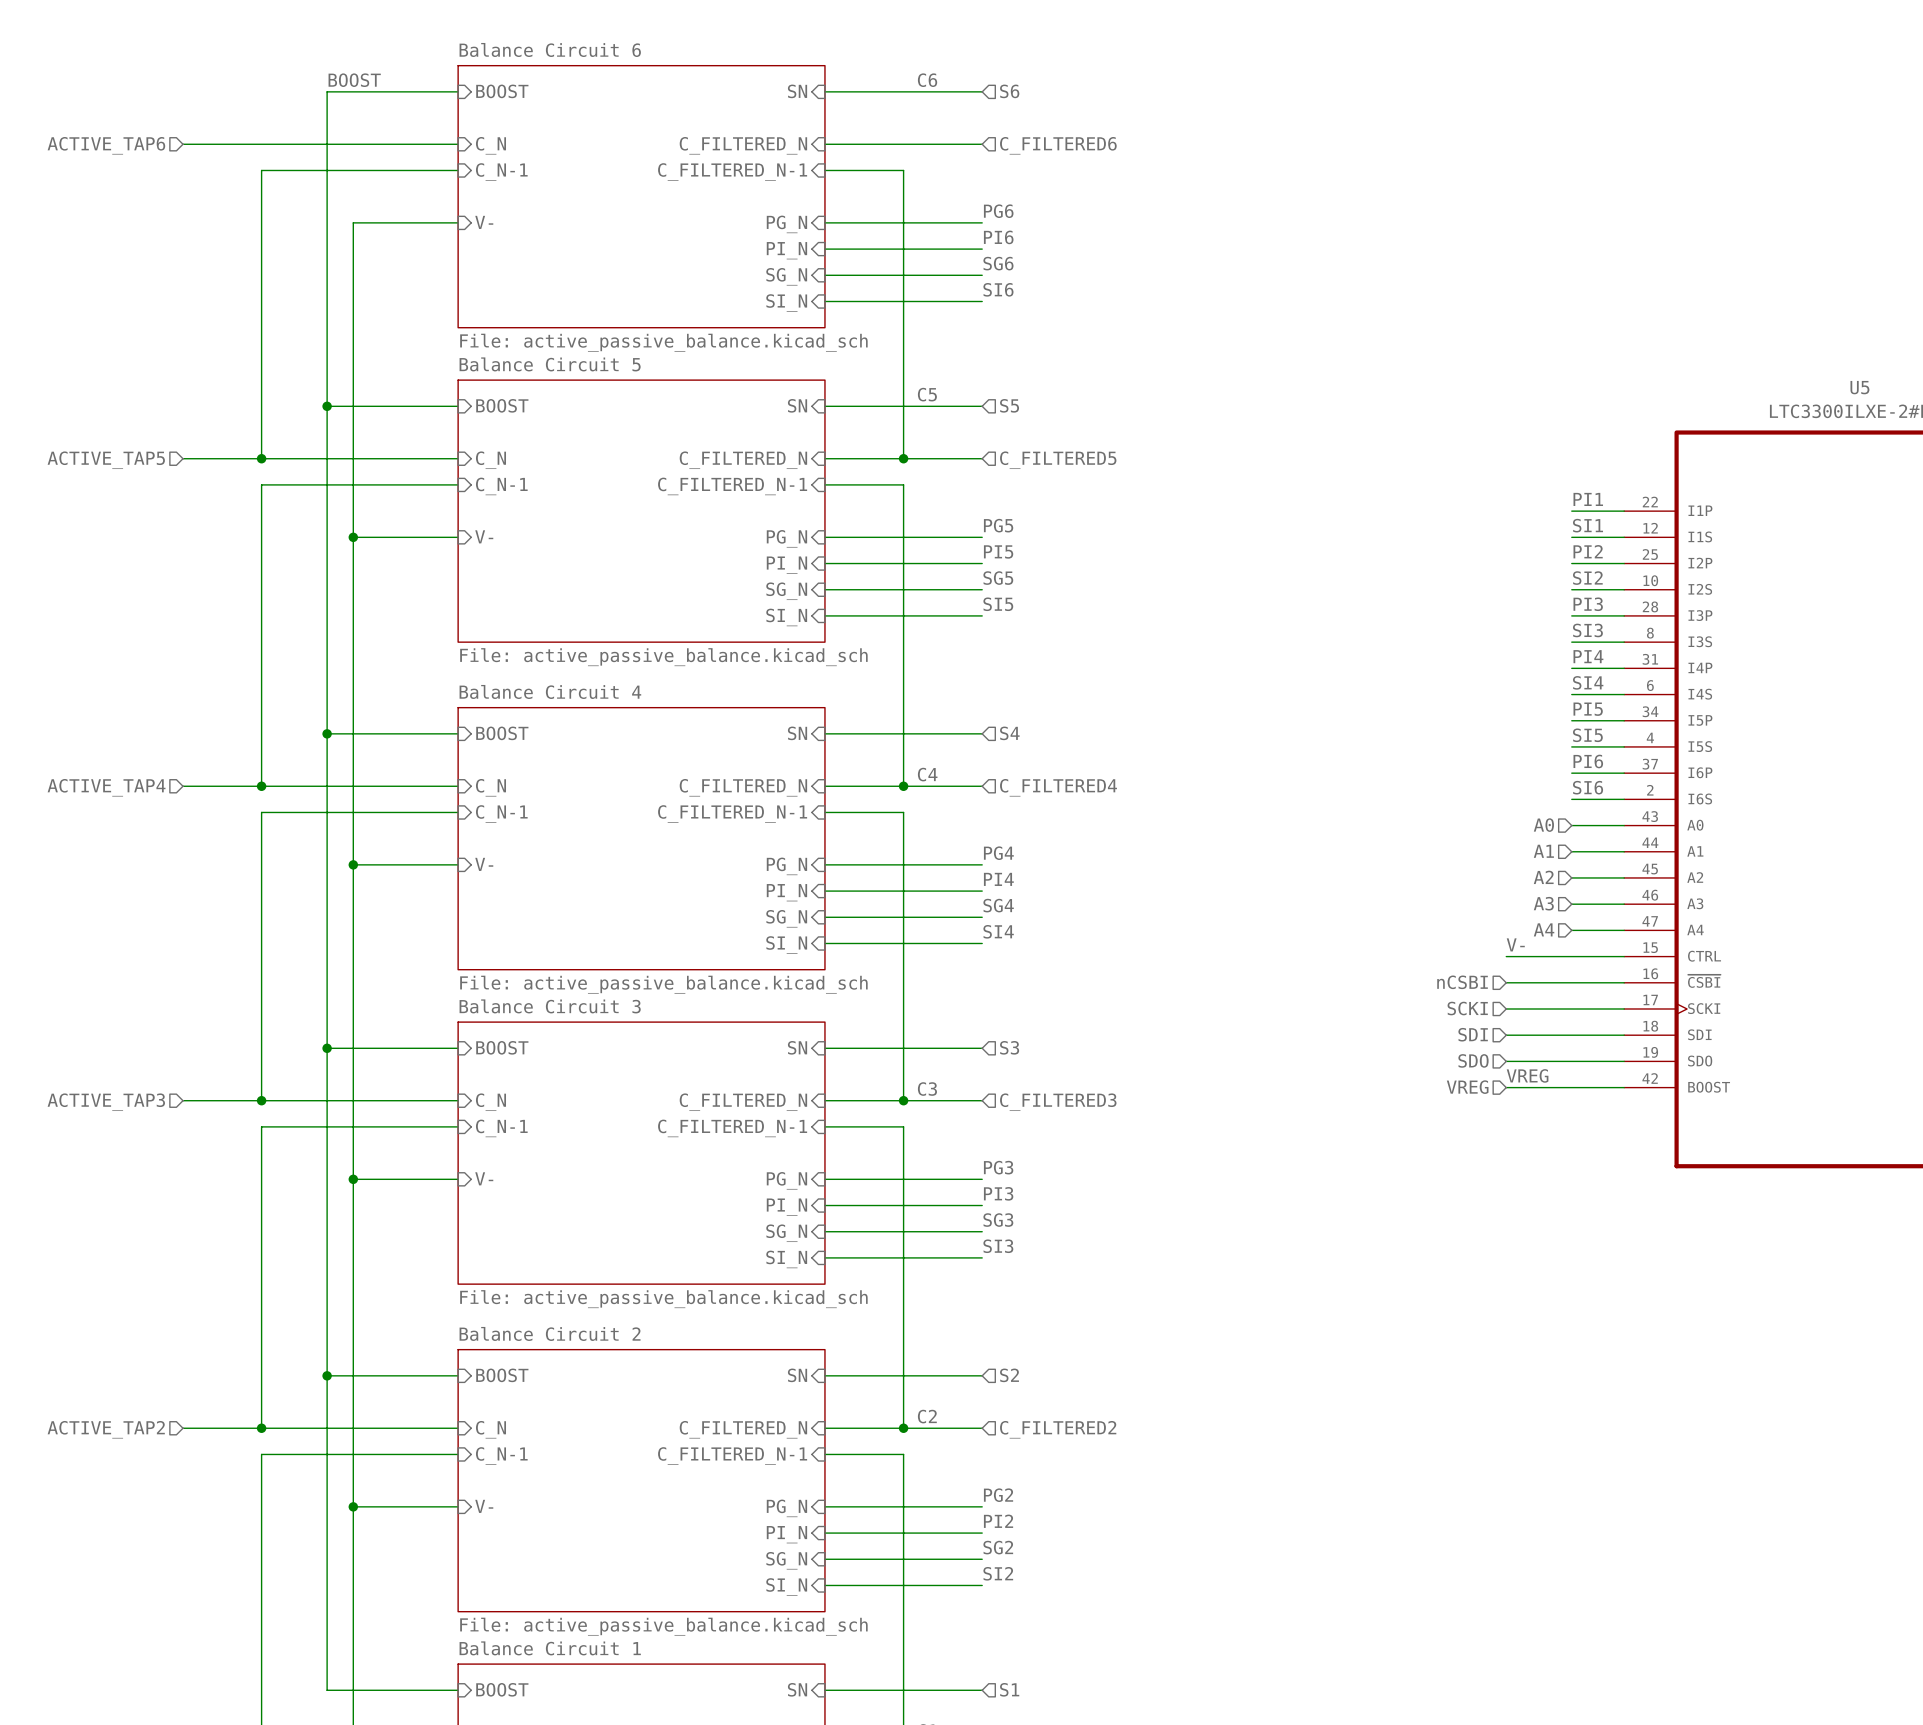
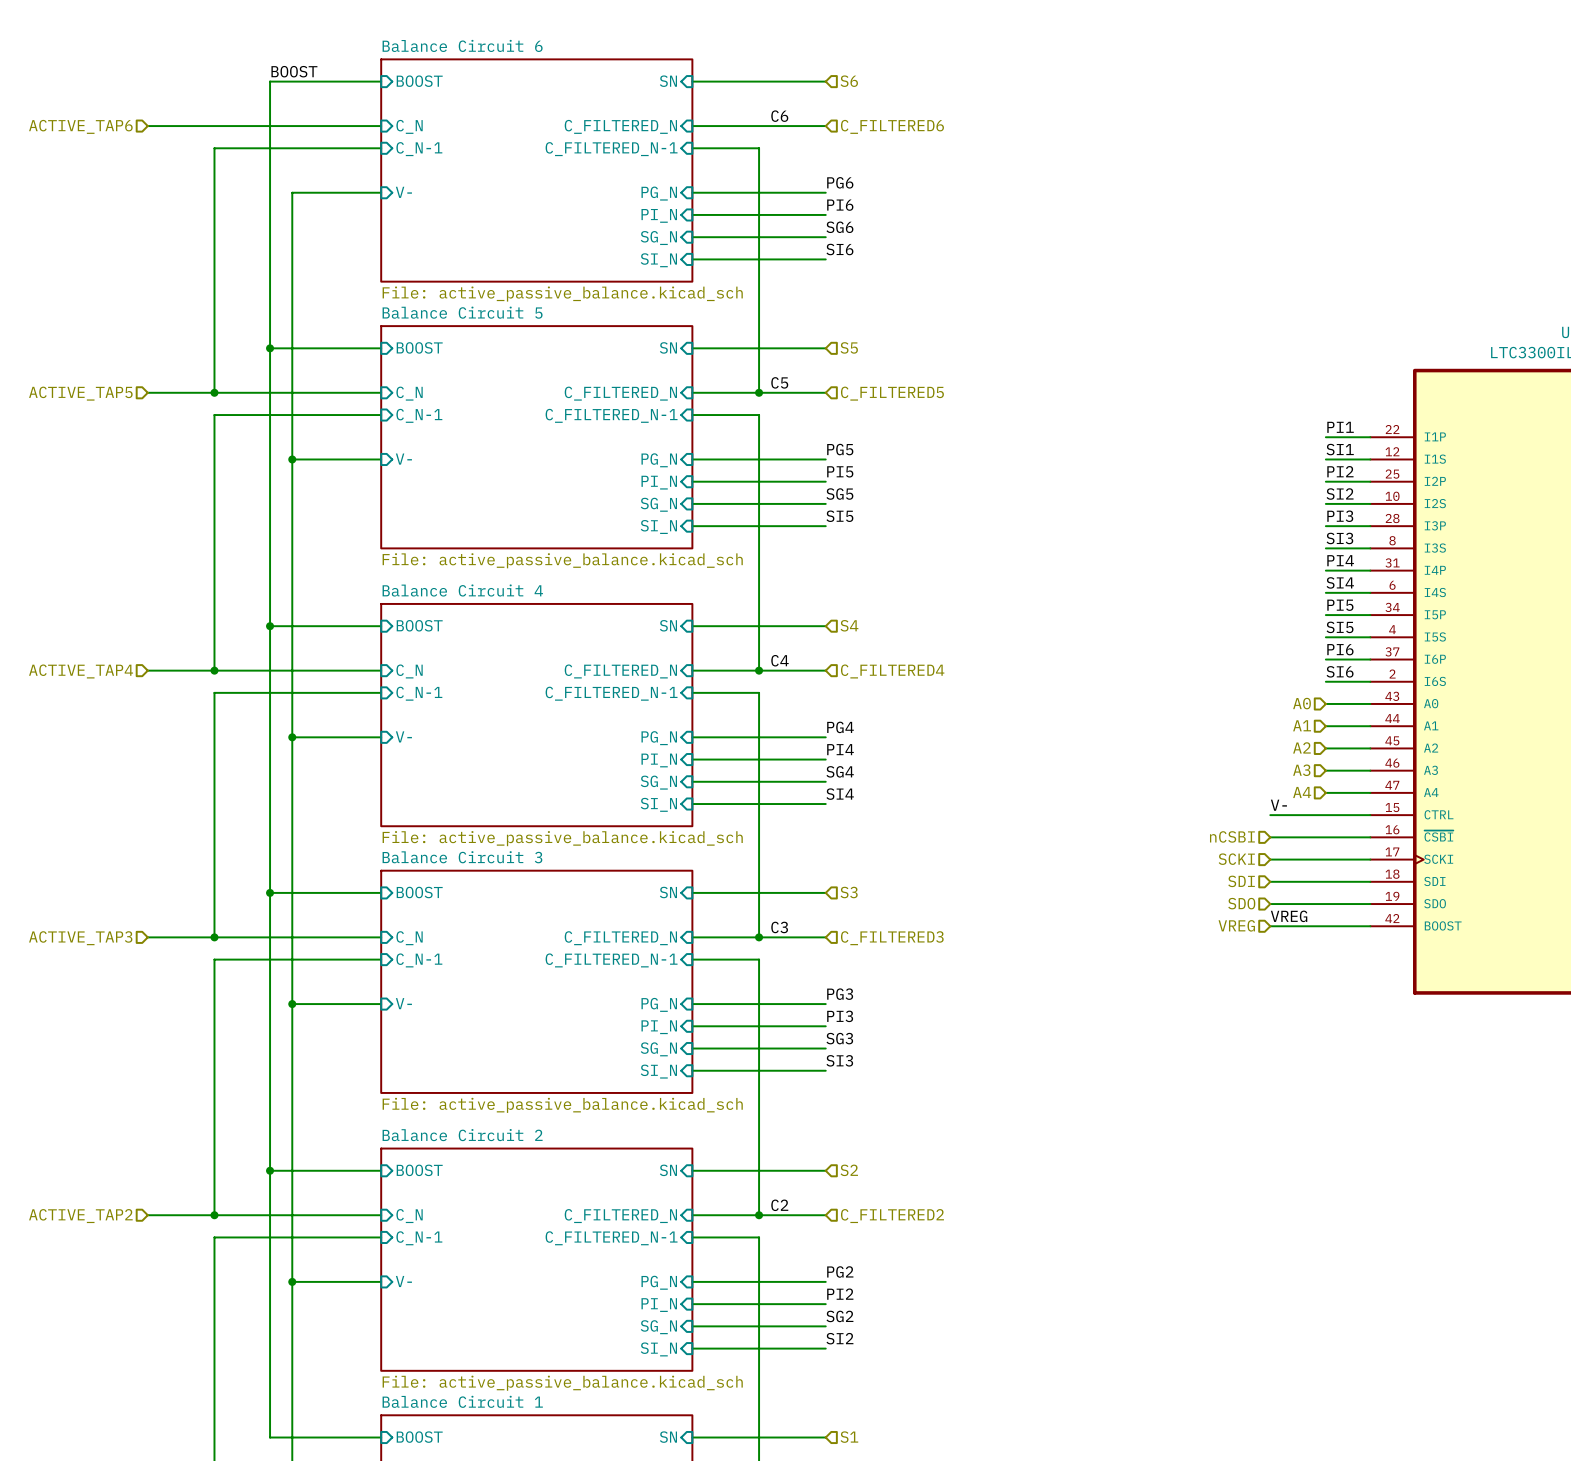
label position: C6 (927, 80) -> C6 (779, 116)
label position: C5 (927, 394) -> C5 (779, 382)

